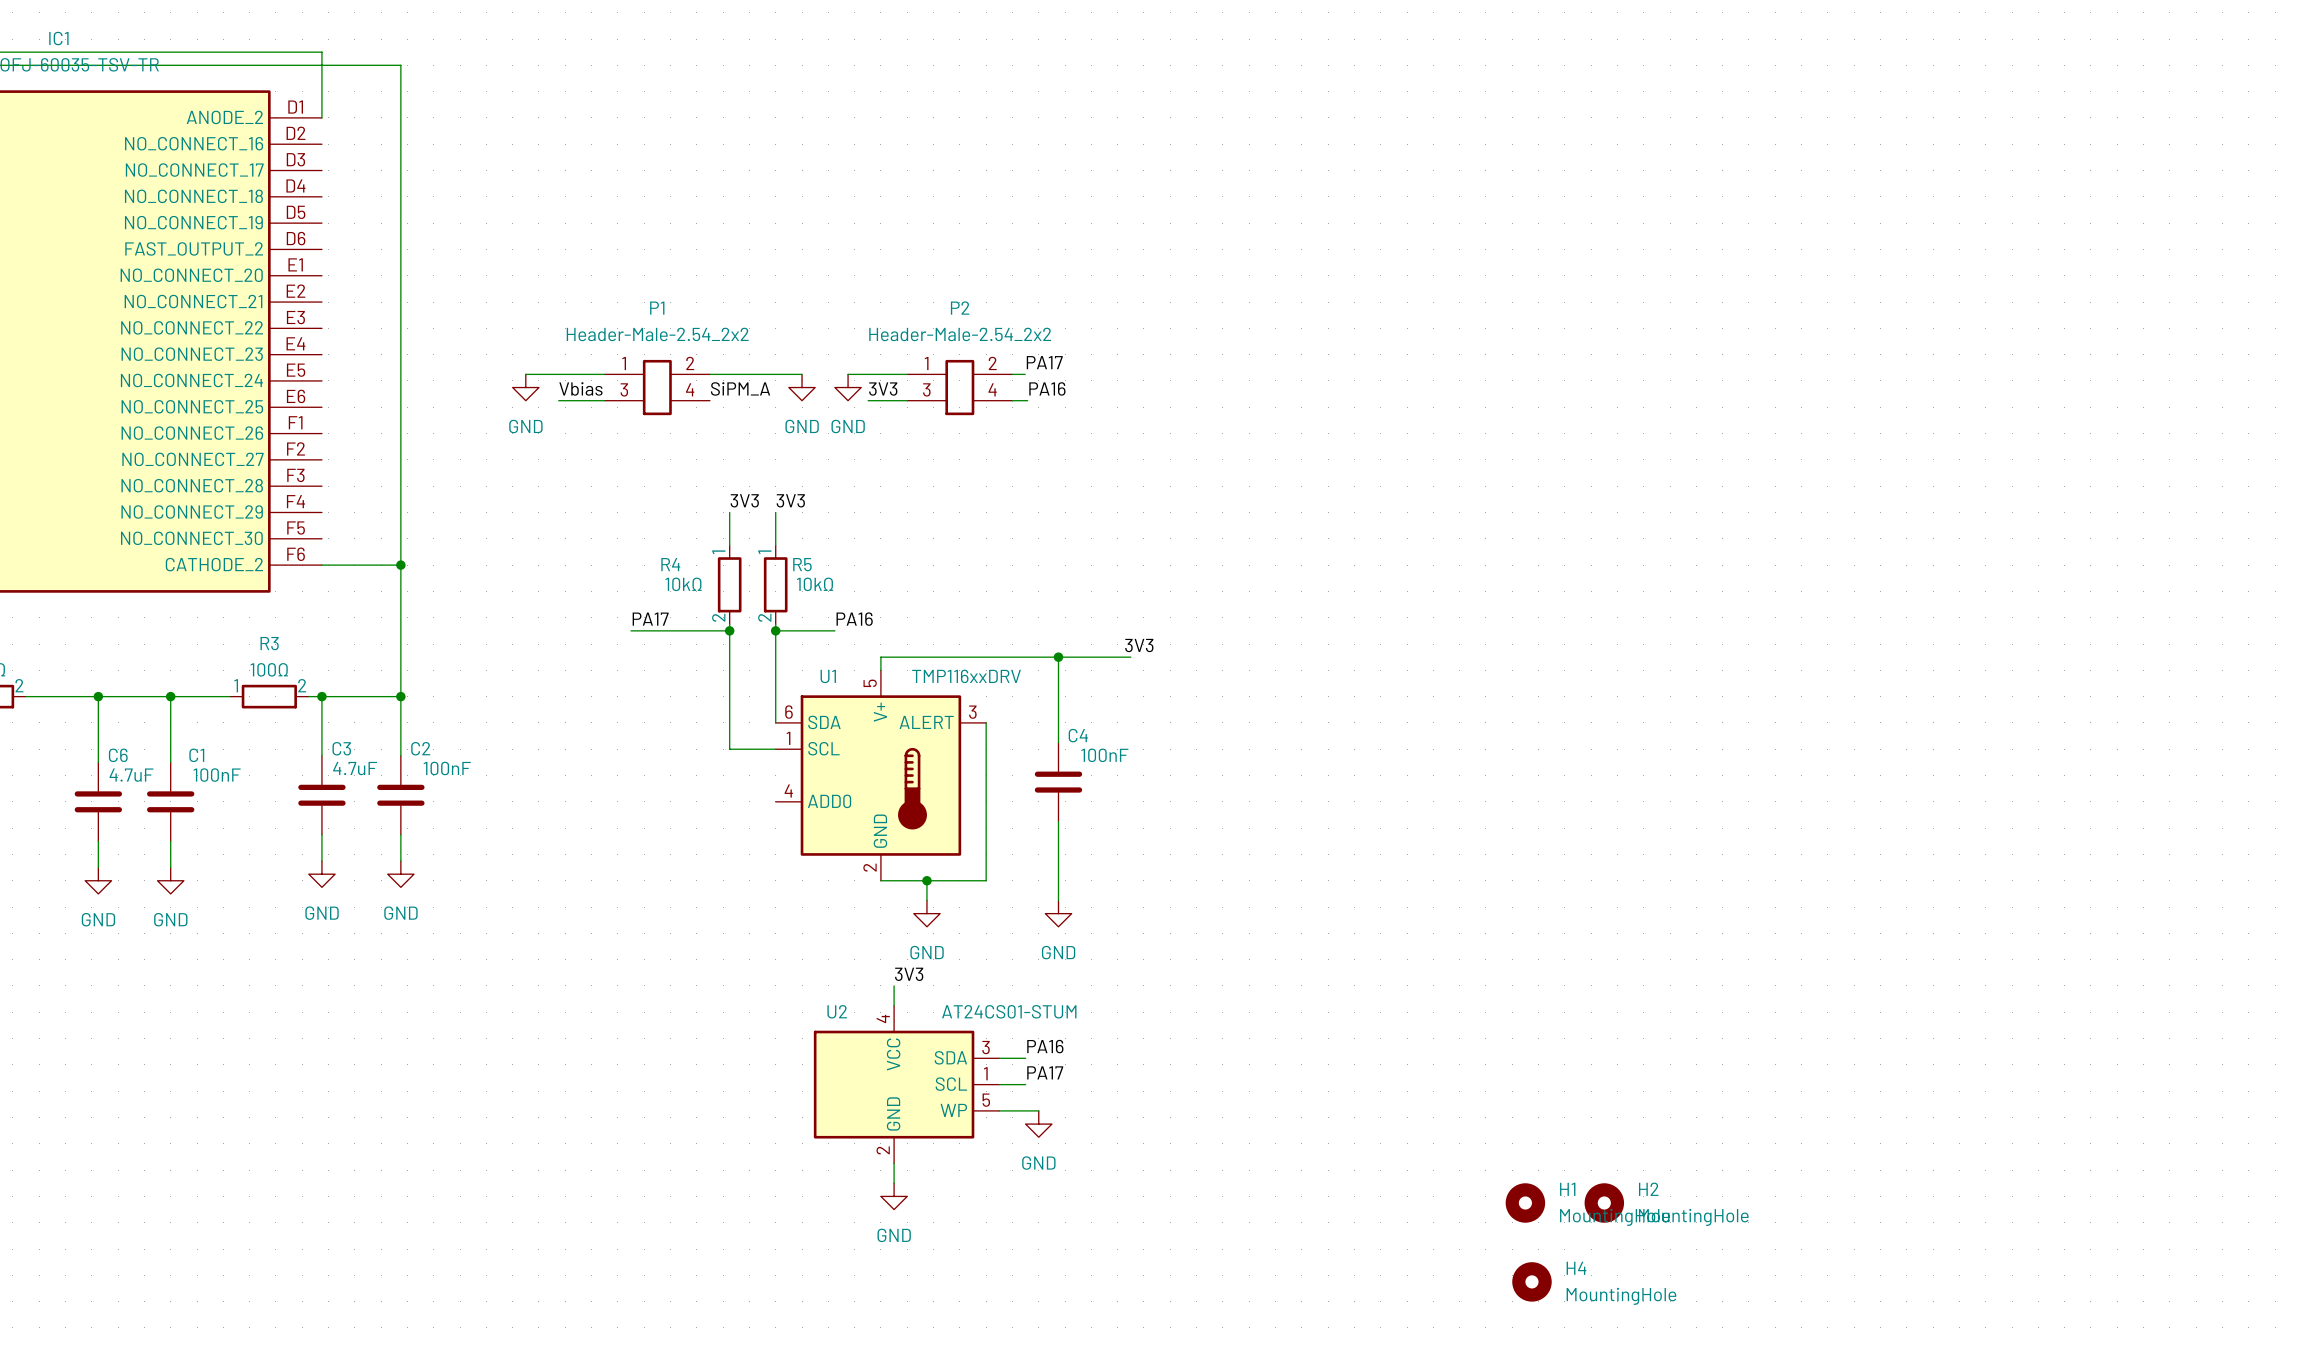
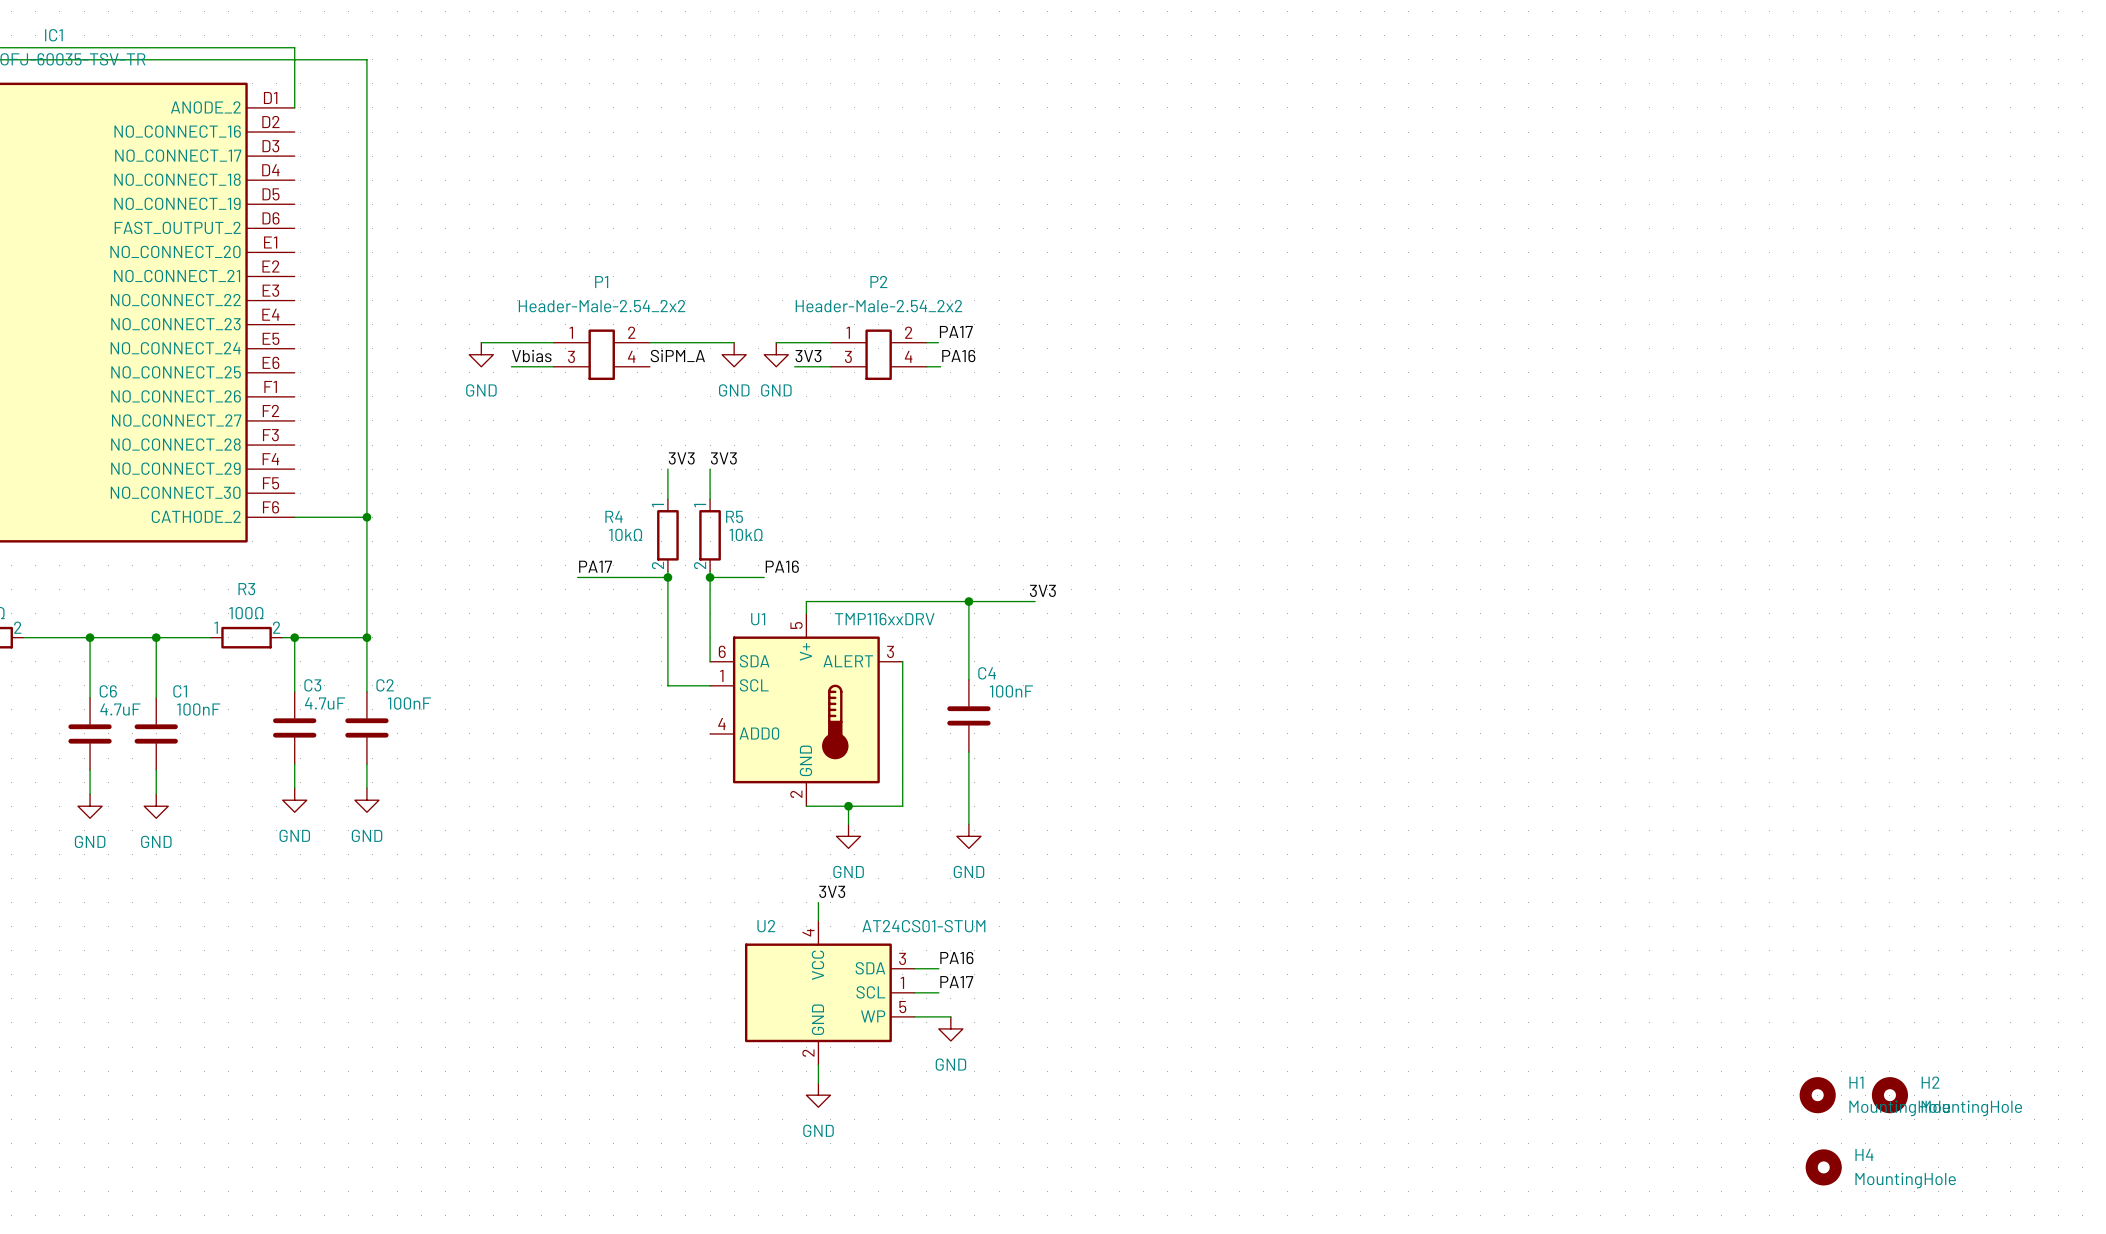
H1 position: (1525, 1202) -> (1817, 1095)
H2 position: (1604, 1202) -> (1889, 1095)
H4 position: (1531, 1281) -> (1823, 1167)

